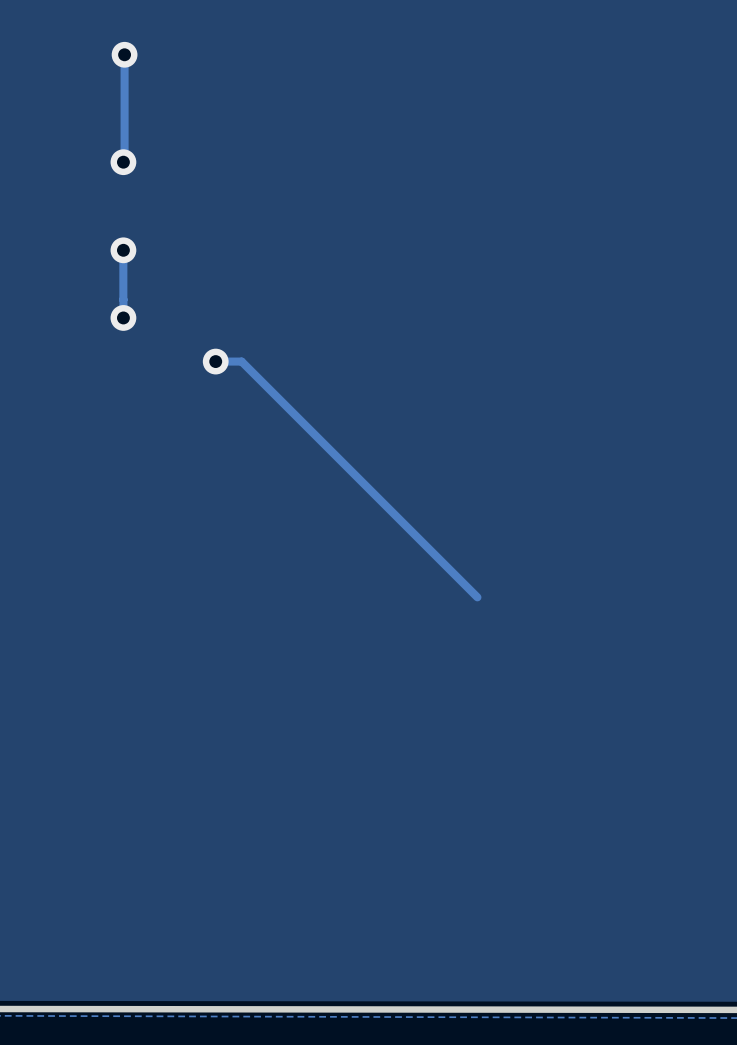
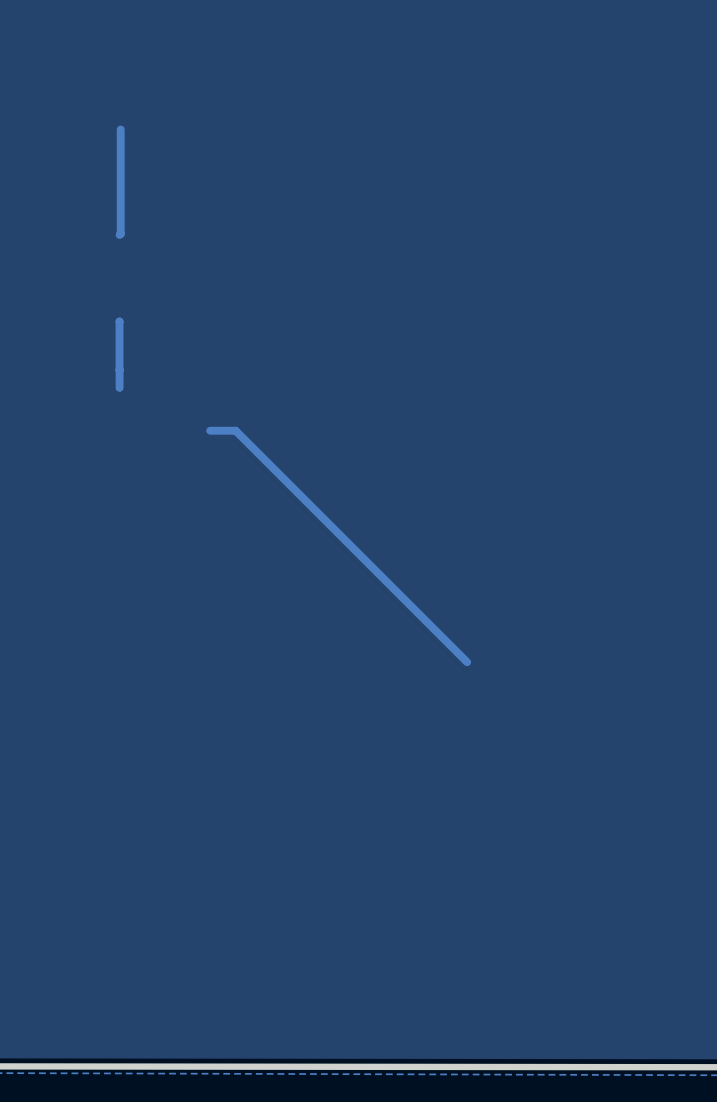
via: (124, 54) -> none
via: (123, 162) -> none
via: (123, 250) -> none
via: (123, 317) -> none
via: (215, 361) -> none

